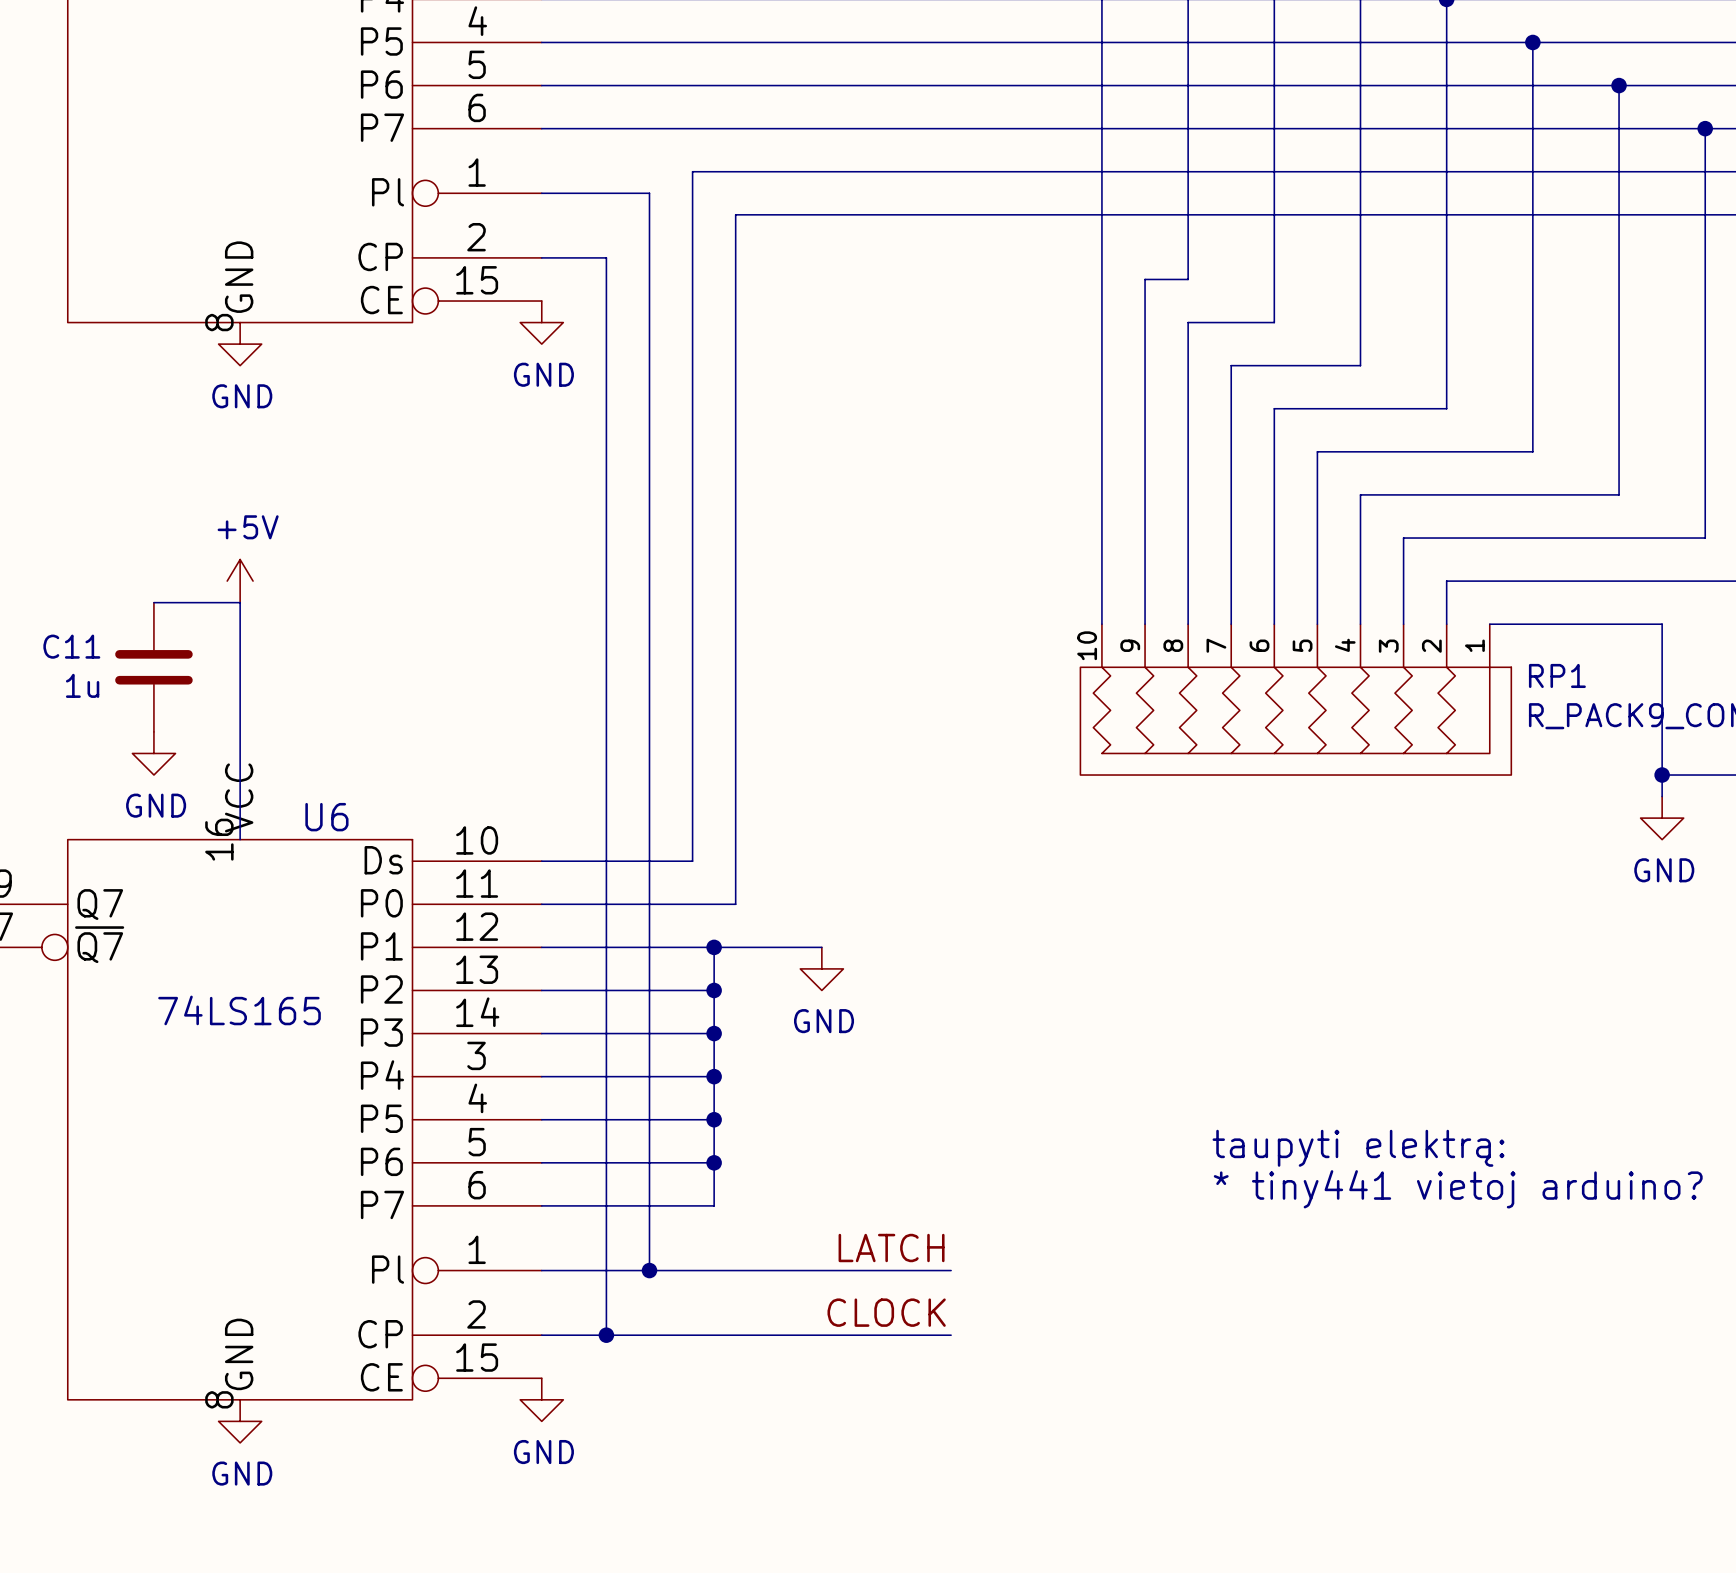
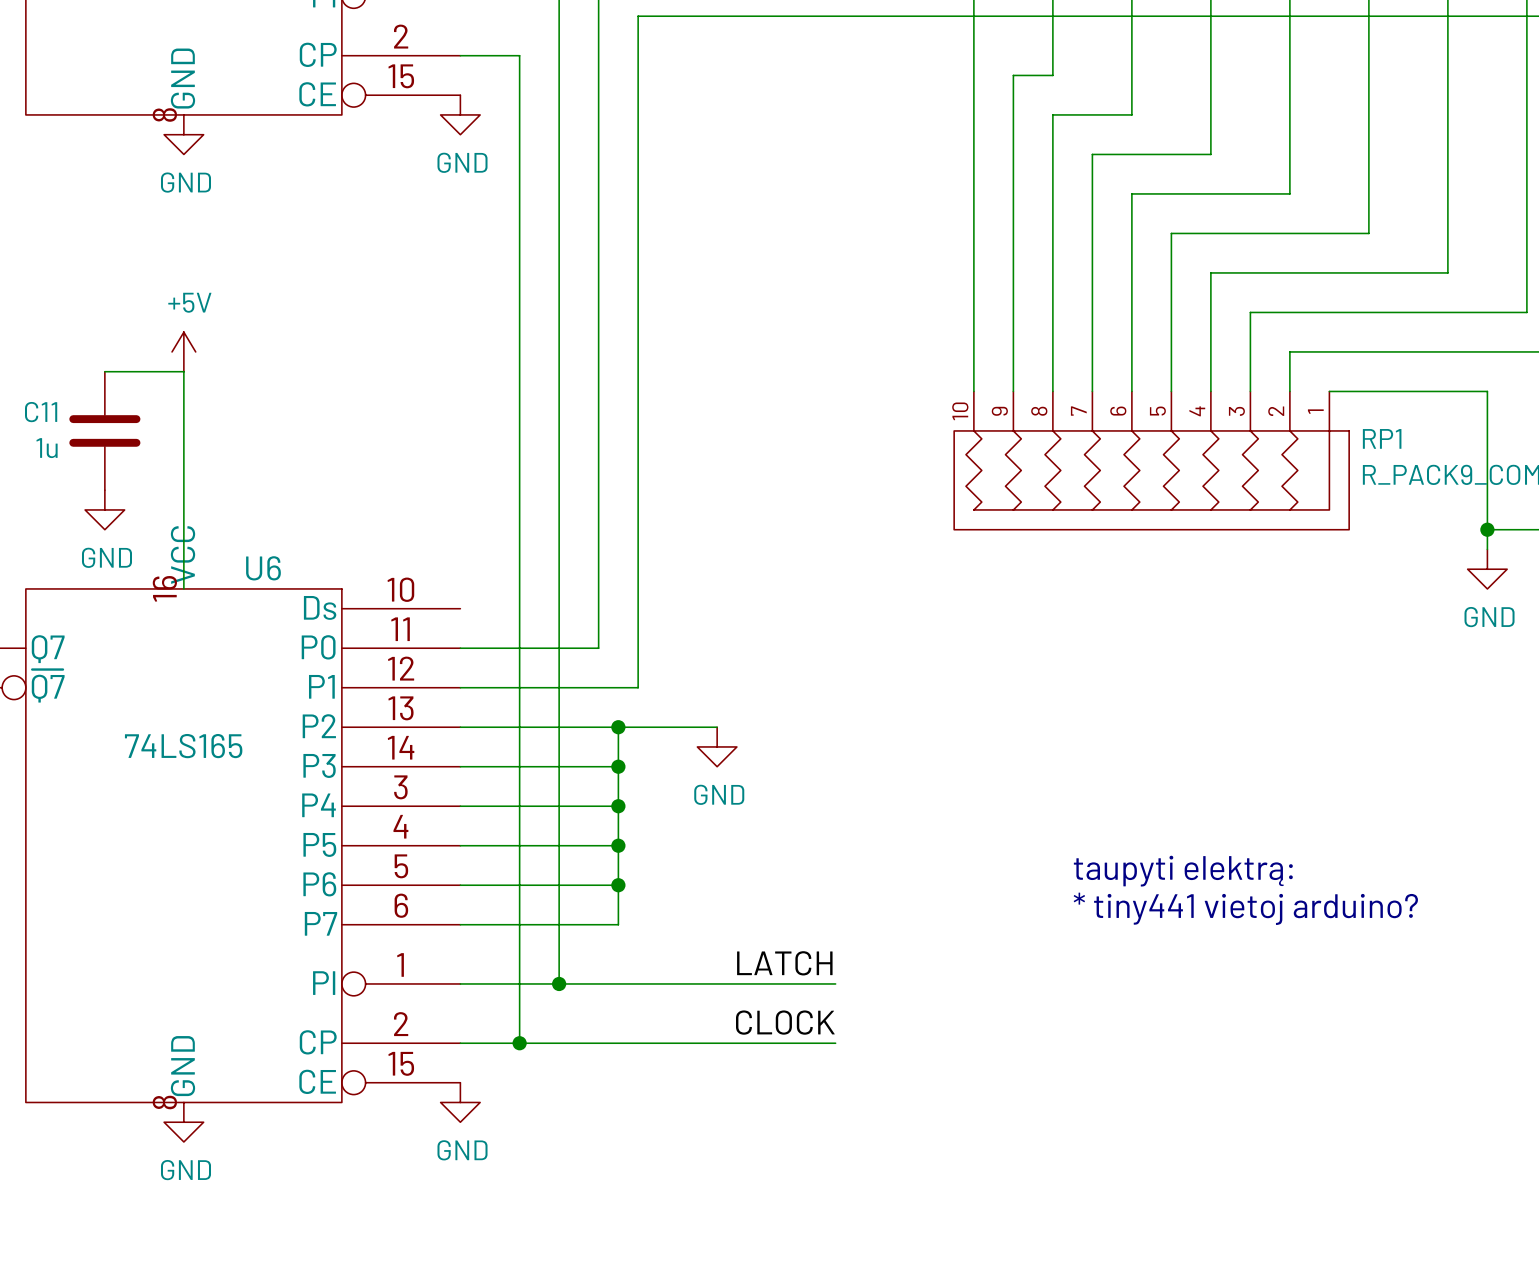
wire: (541, 861) (692, 861) -> none
wire: (692, 904) (735, 904) -> (598, 648) (598, 608)
wire: (714, 947) (714, 990) -> (717, 727) (618, 727)
junction: (714, 947) -> none
wire: (735, 947) (821, 947) -> (638, 687) (638, 648)
power symbol position: GND (821, 968) -> GND (717, 746)

